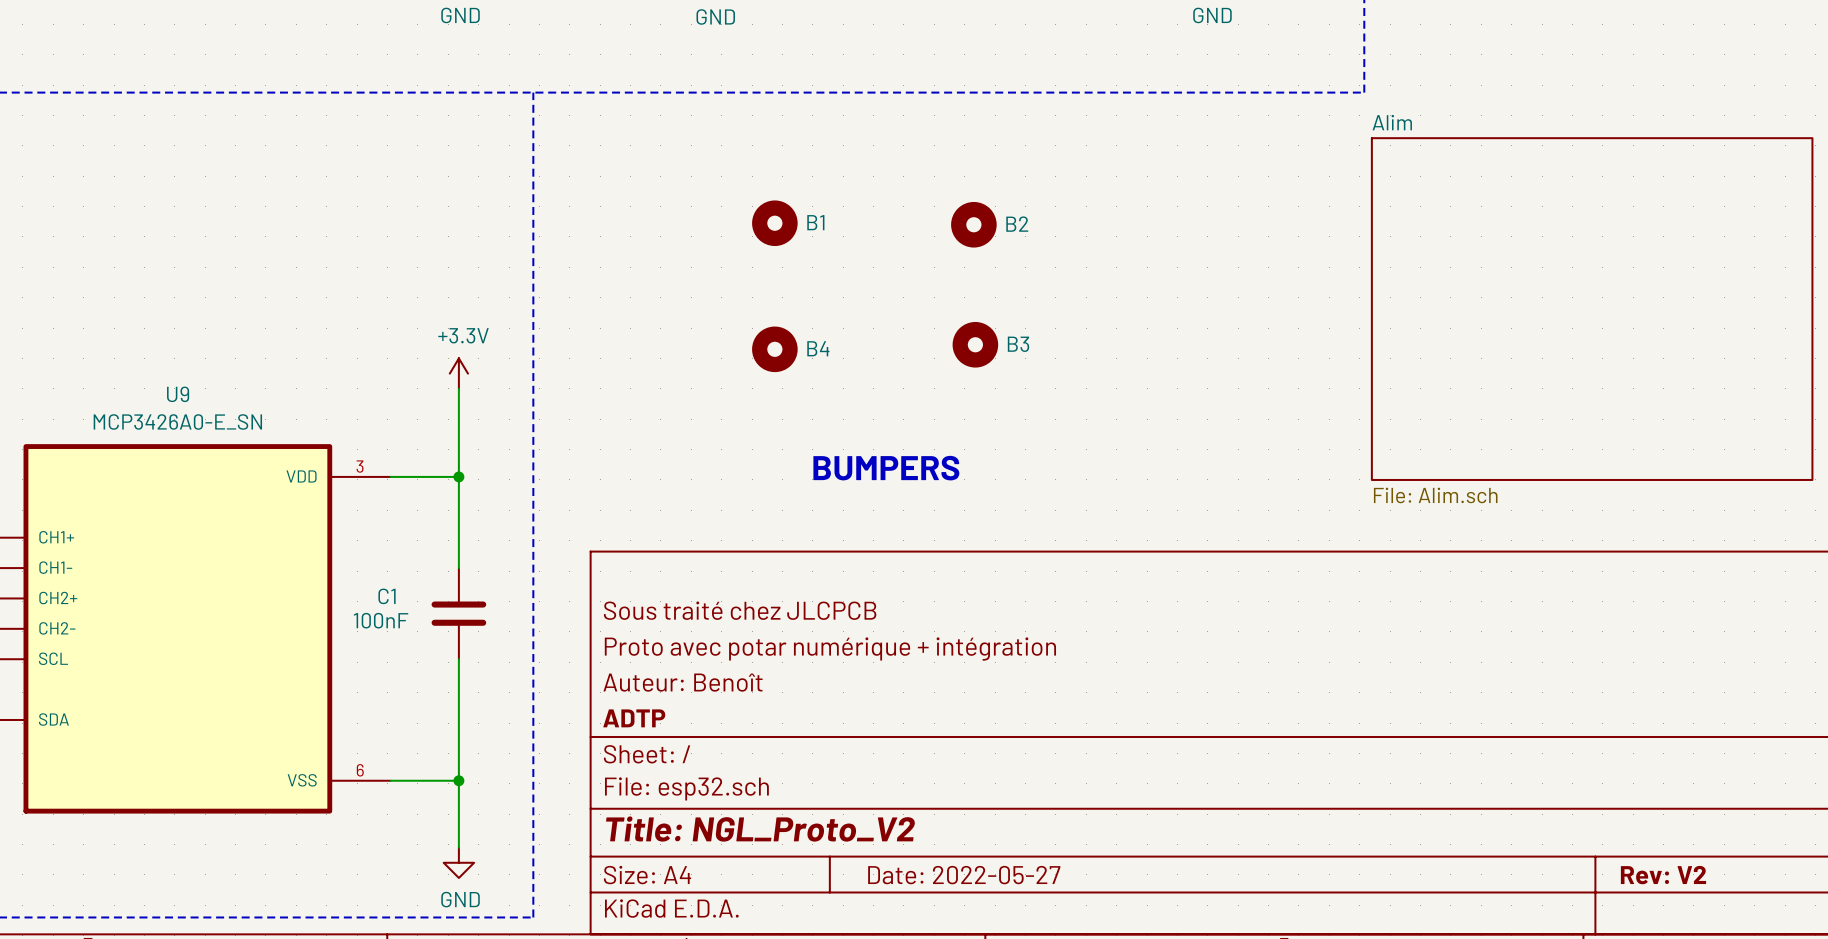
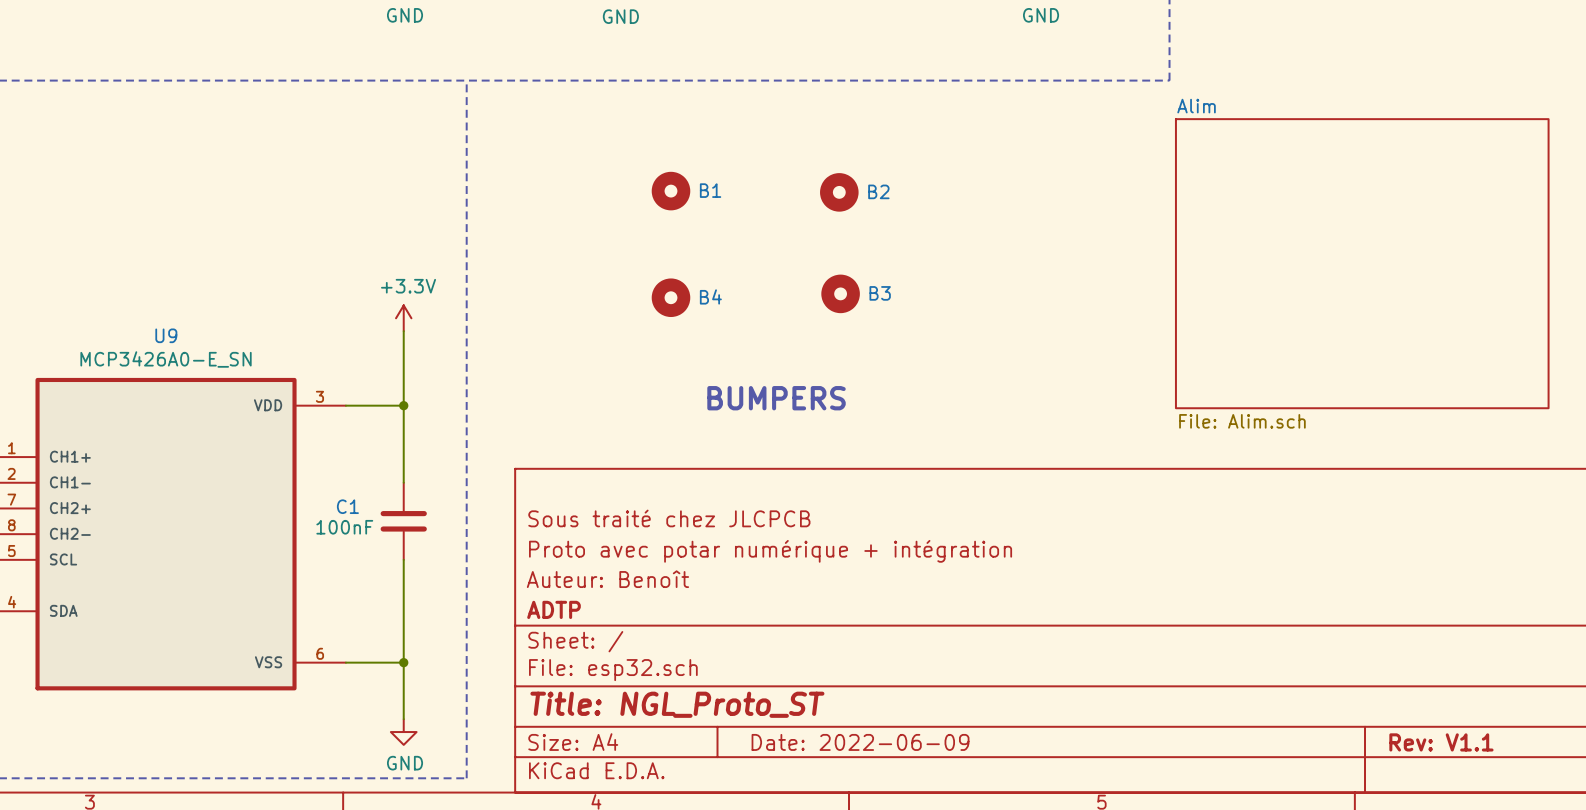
title block: Title: NGL_Proto_V2 (760, 829) -> Title: NGL_Proto_ST (677, 704)
title block: Date: 2022-05-27 (964, 875) -> Date: 2022-06-09 (860, 742)
title block: Rev: V2 (1663, 875) -> Rev: V1.1 (1441, 742)

